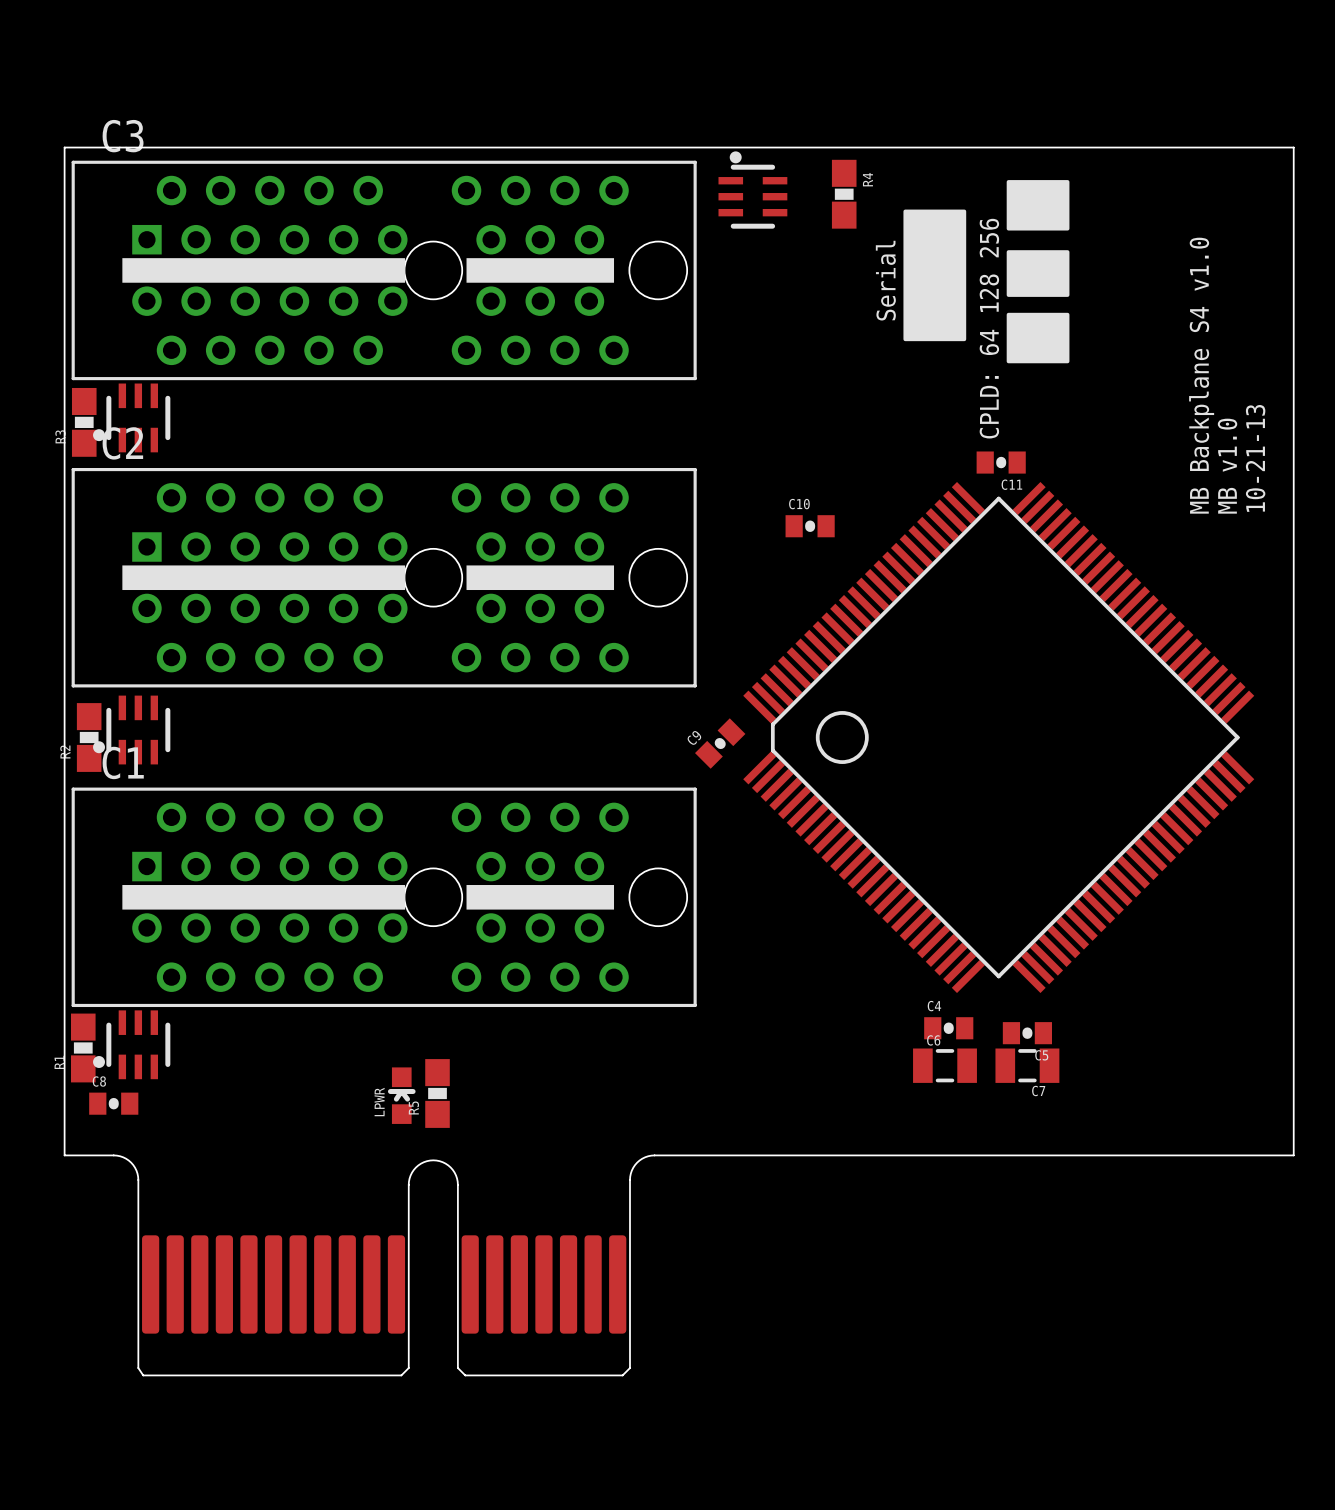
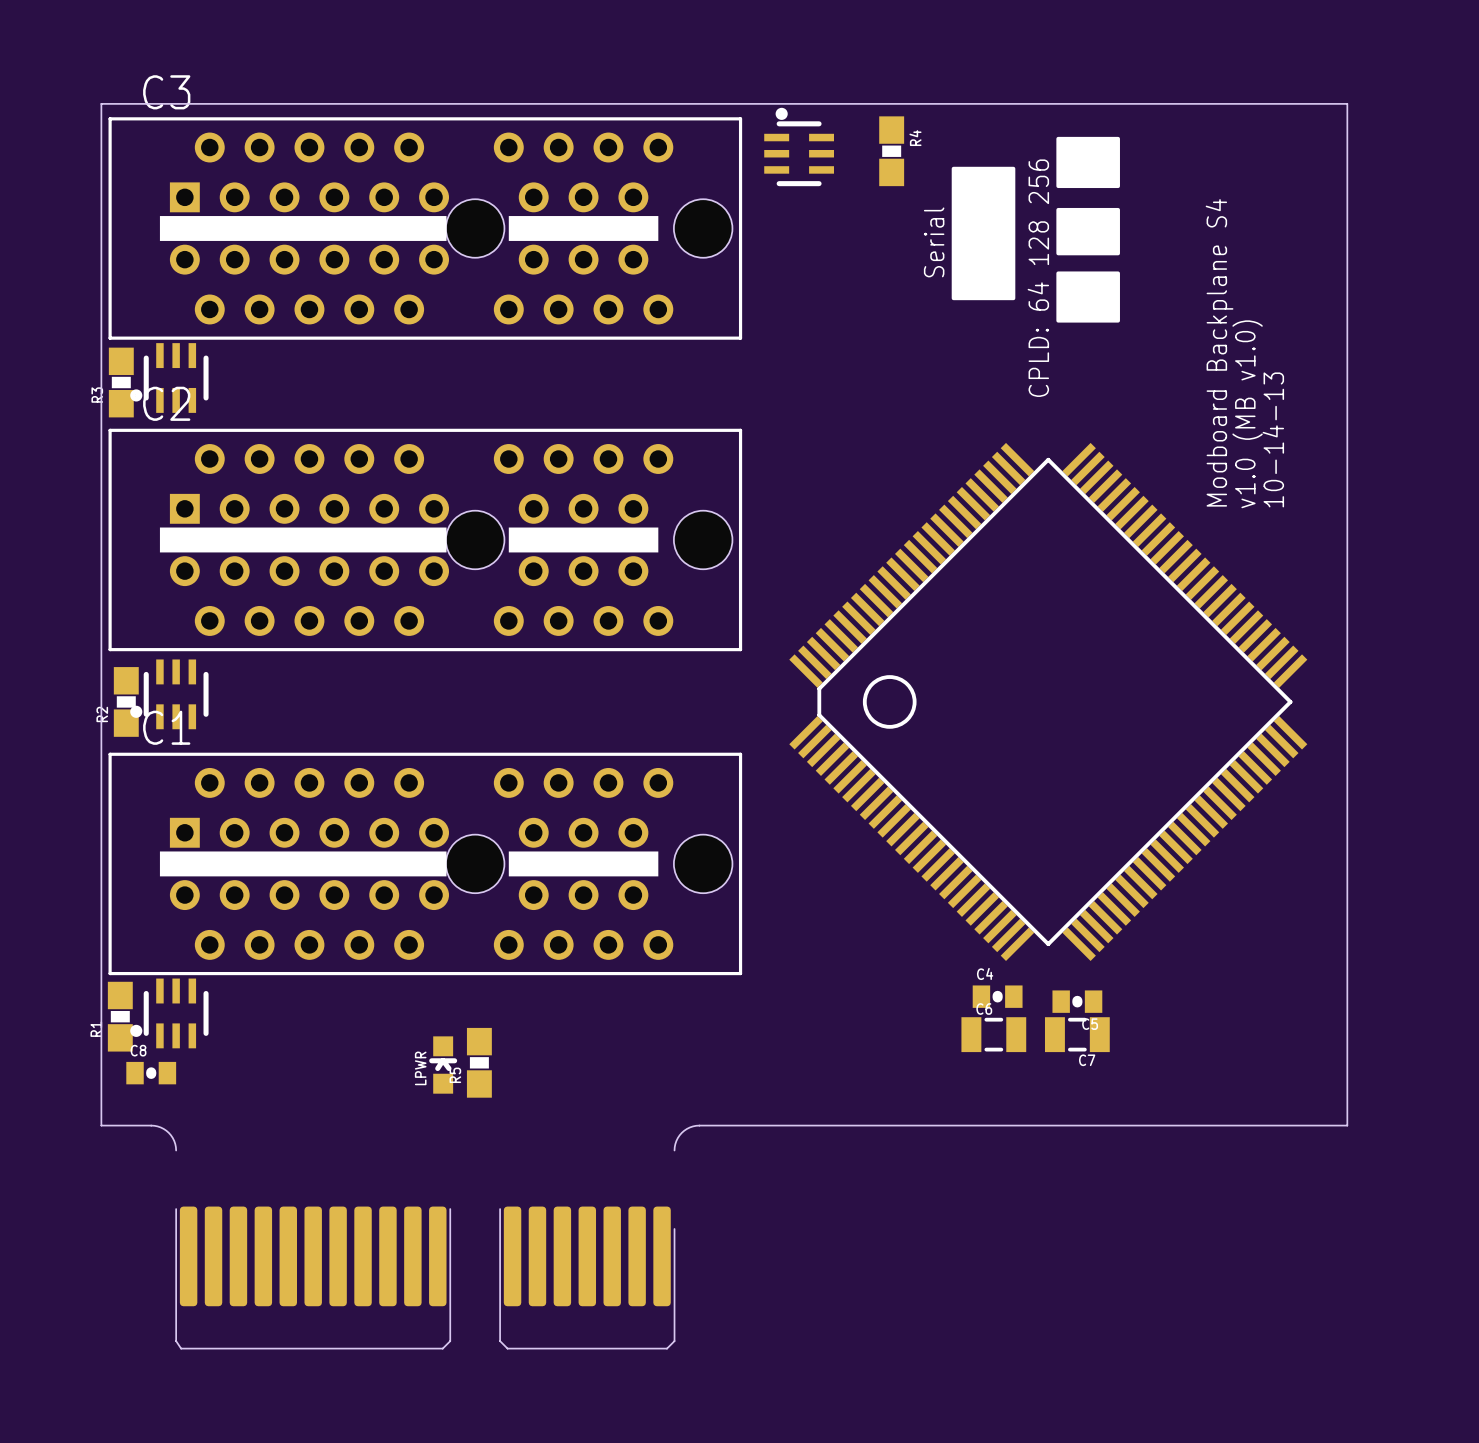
text: MB Backplane S4 v1.0 (1201, 375) -> Modboard Backplane S4 (1219, 352)
text: 10-21-13 (1255, 458) -> 10-14-13 (1273, 439)
C11: (1001, 462) -> none
text: MB v1.0 (1227, 466) -> v1.0 (MB v1.0) (1247, 414)
C10: (810, 526) -> none
C9: (720, 743) -> none
part: (384, 1267) -> none
part: none -> (425, 1277)

